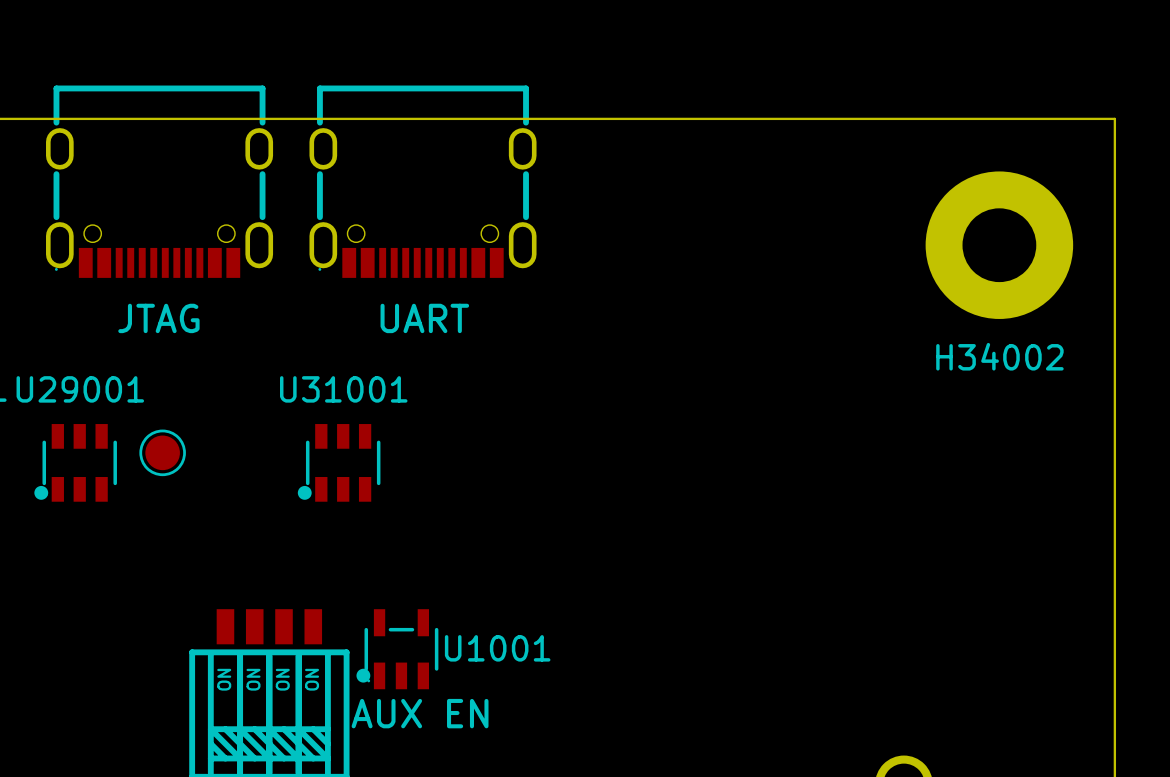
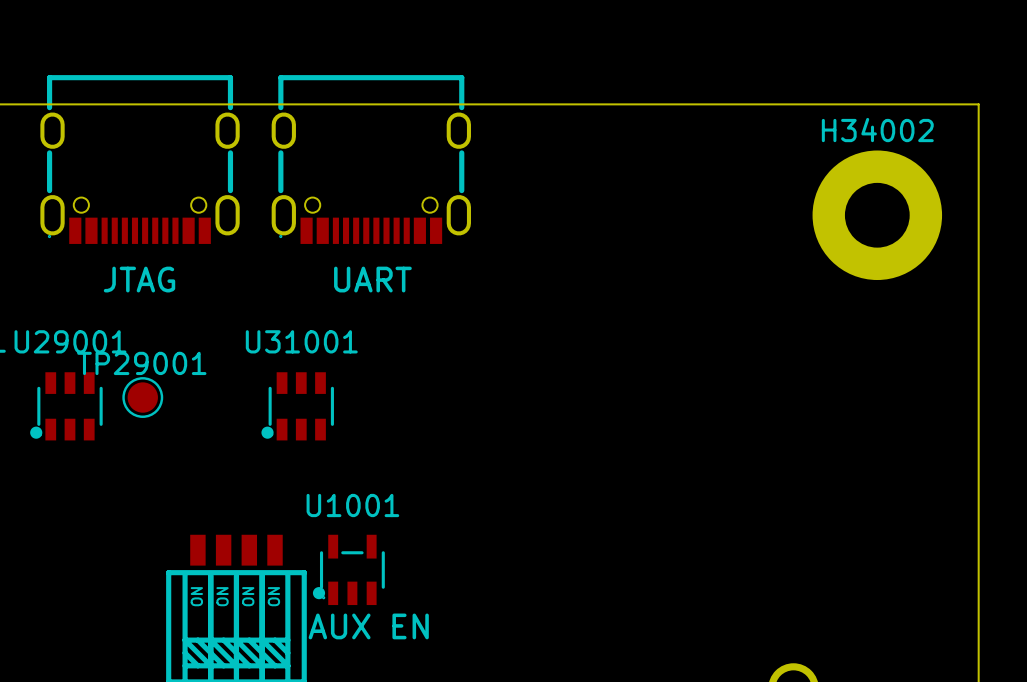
H34002 name position: H34002 (999, 356) -> H34002 (877, 130)
TP29001 name: none -> TP29001 (141, 363)
U1001 name position: U1001 (497, 648) -> U1001 (352, 505)

